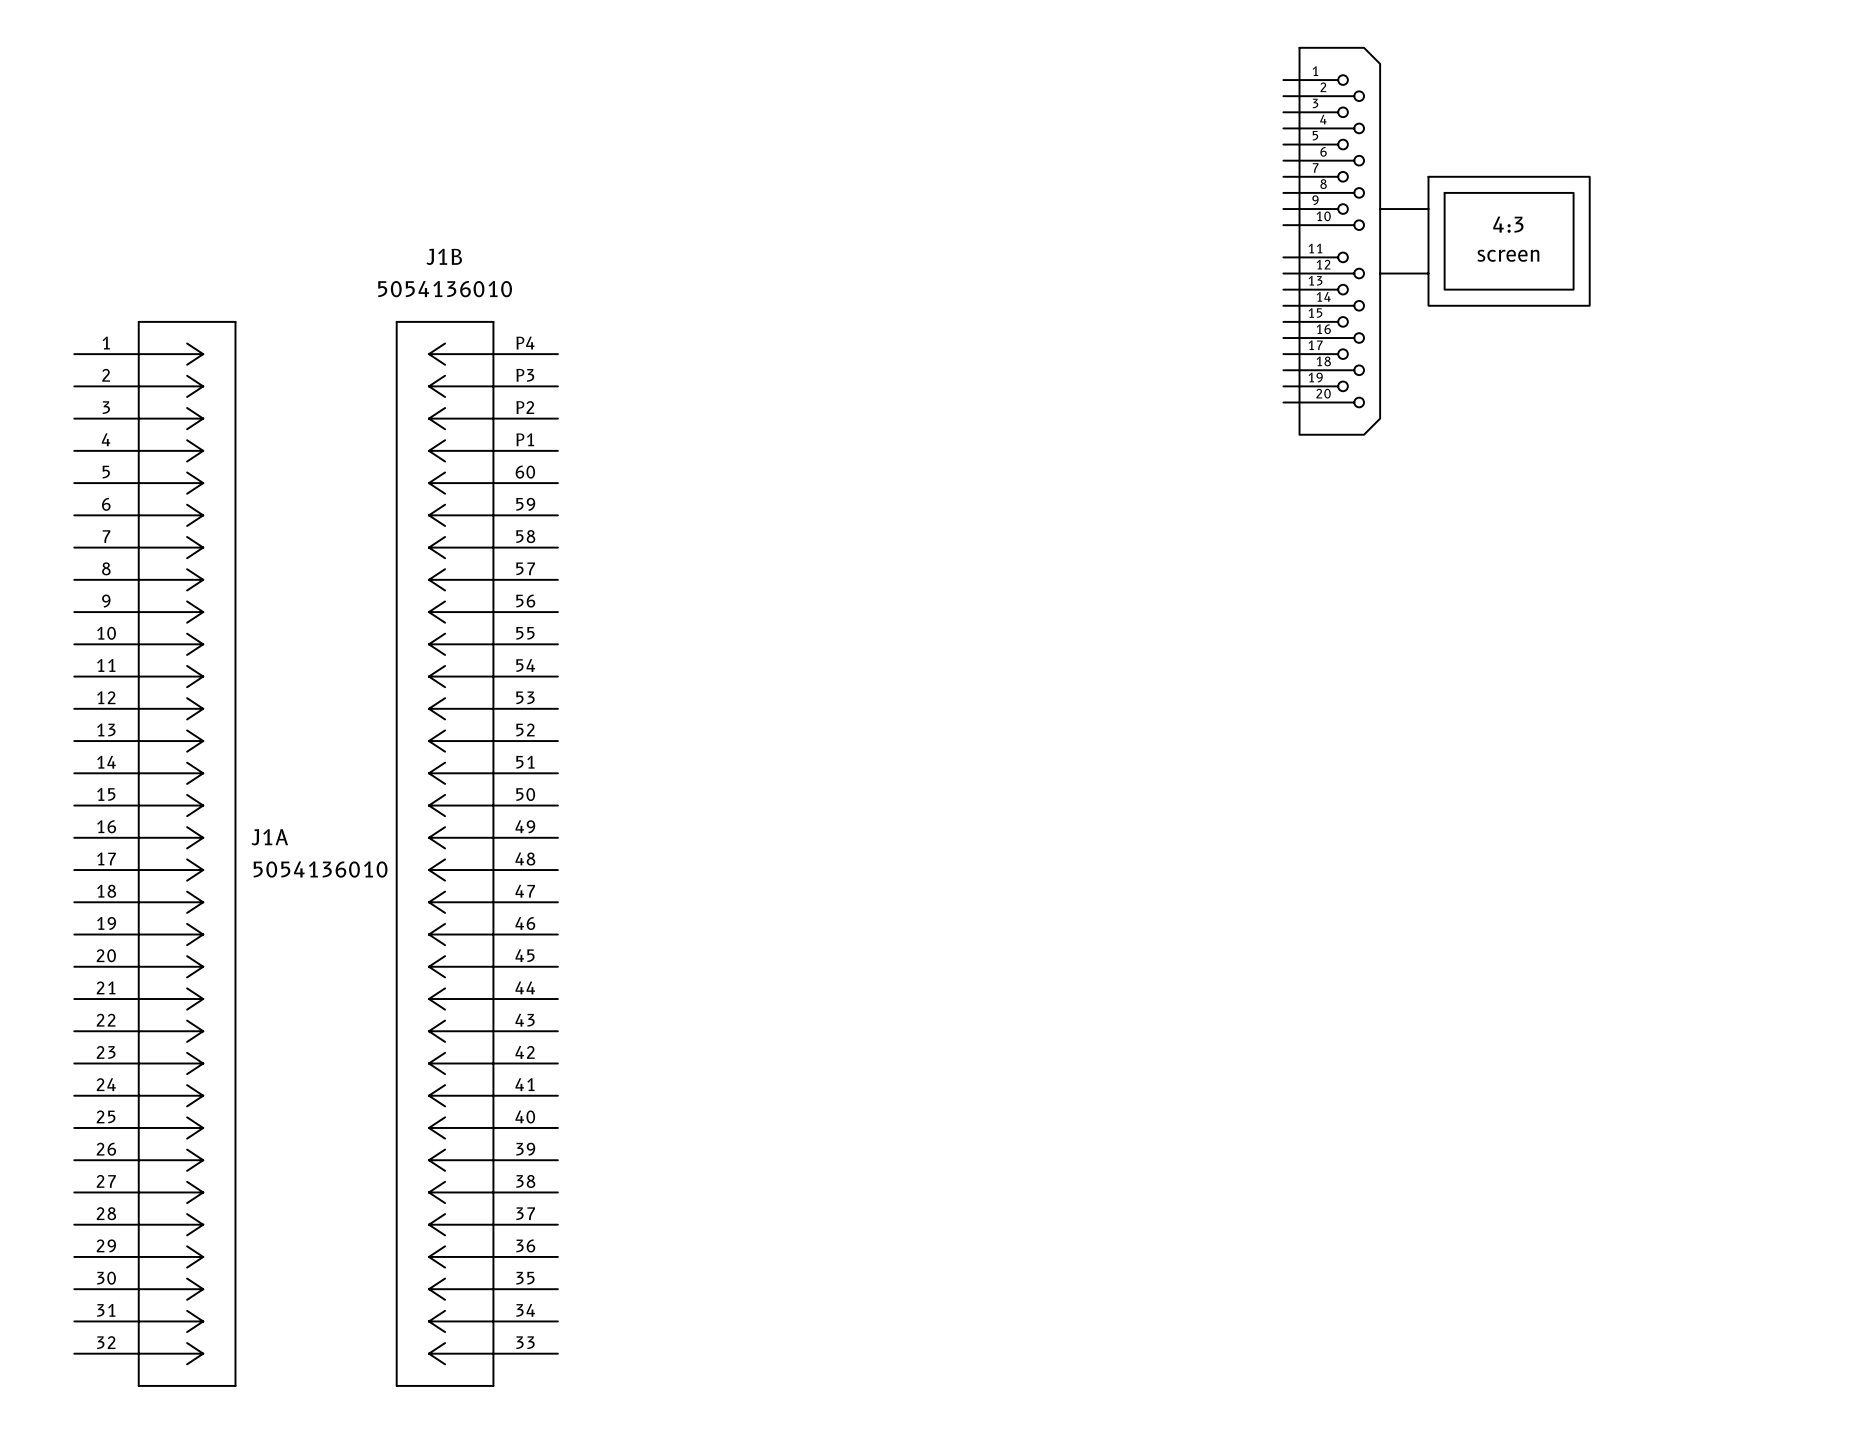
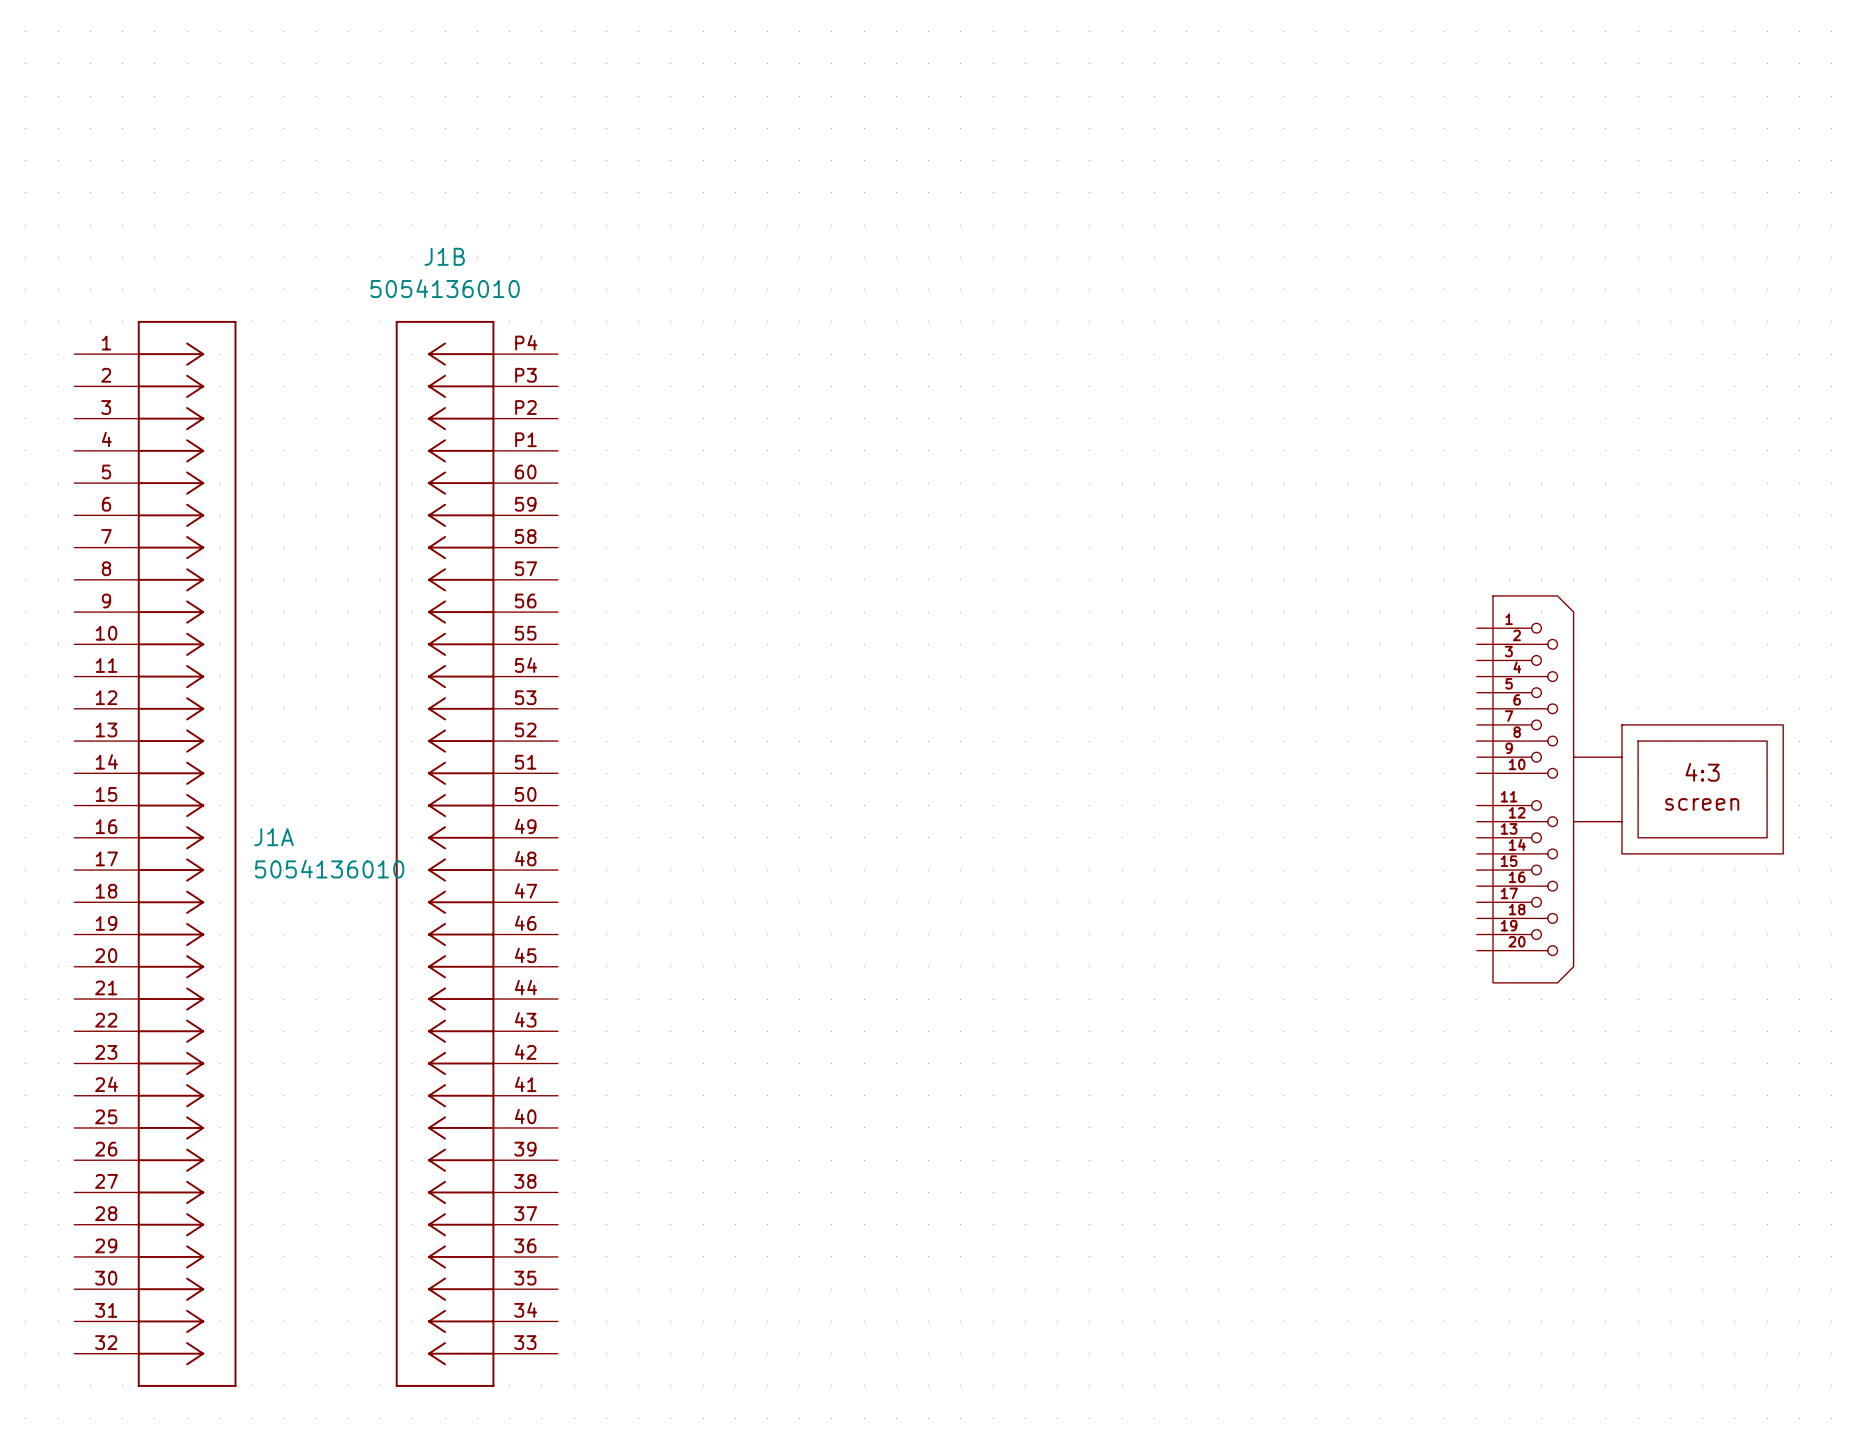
part: (1436, 241) -> none
part: none -> (1630, 789)

